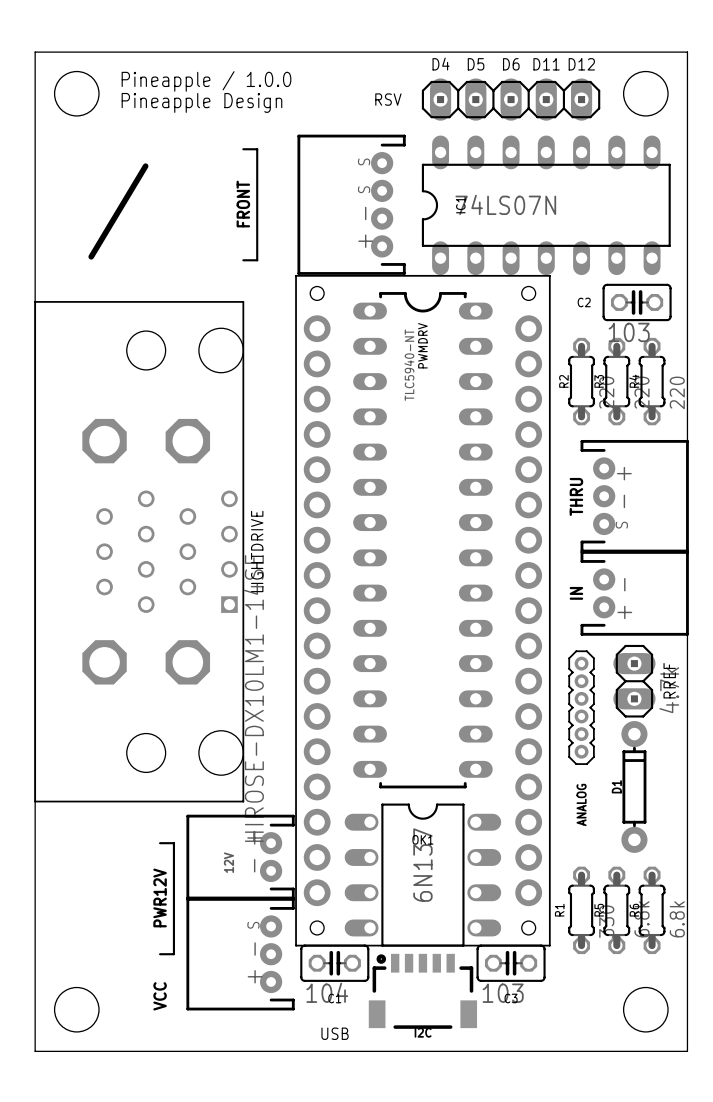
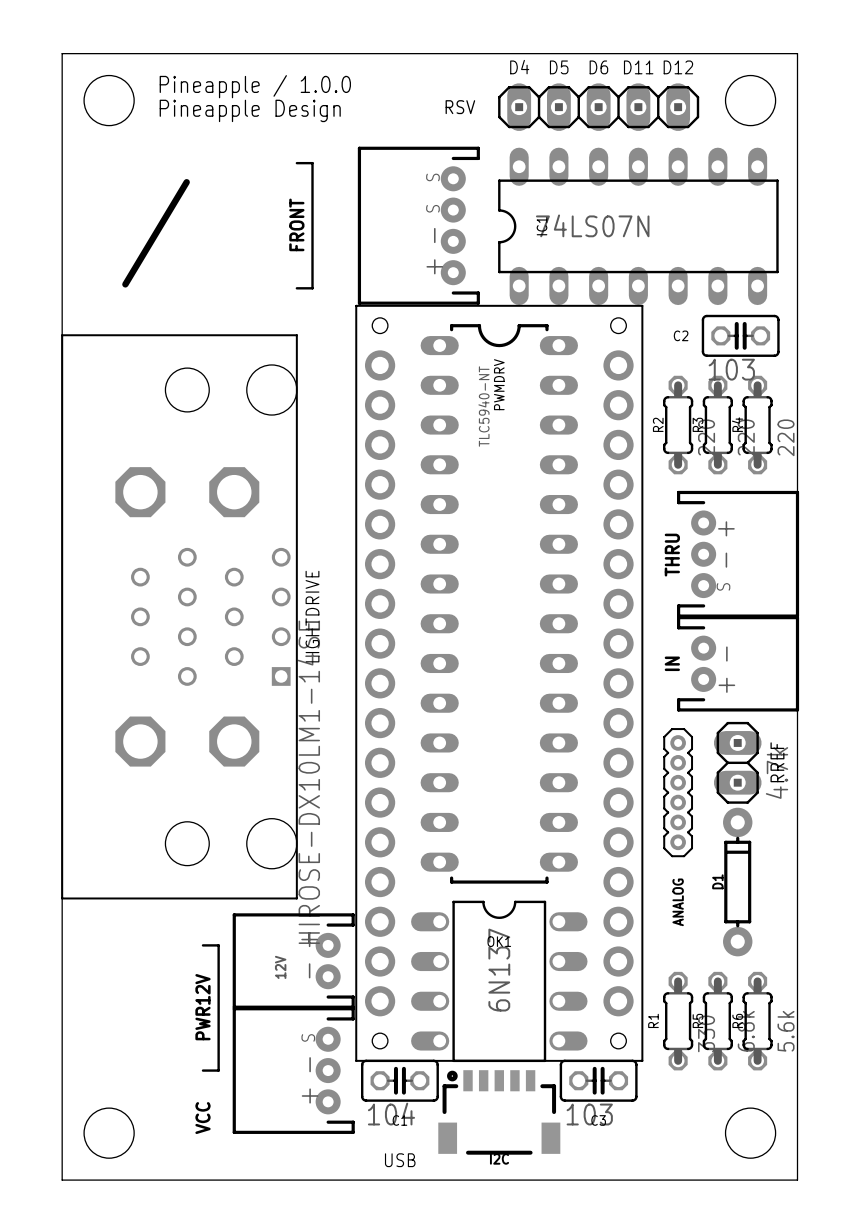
R6 value: 6.8k (677, 919) -> 5.6k (786, 1031)

